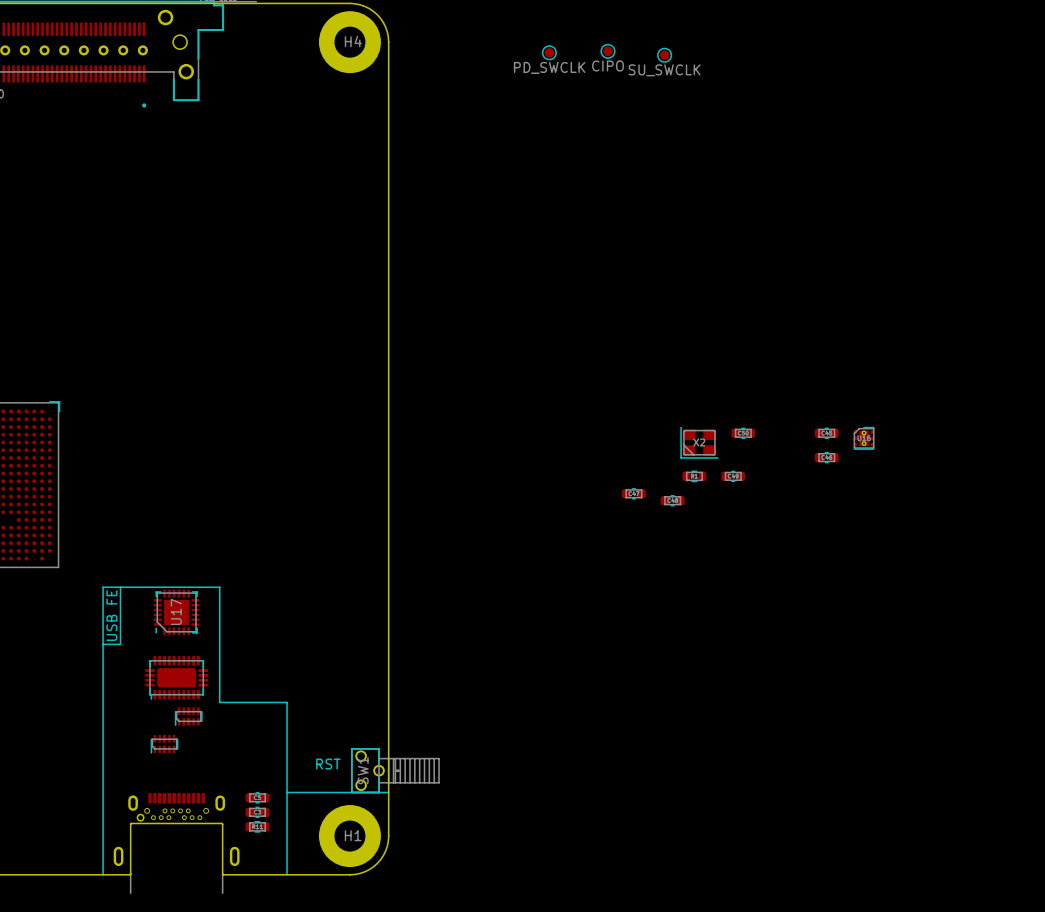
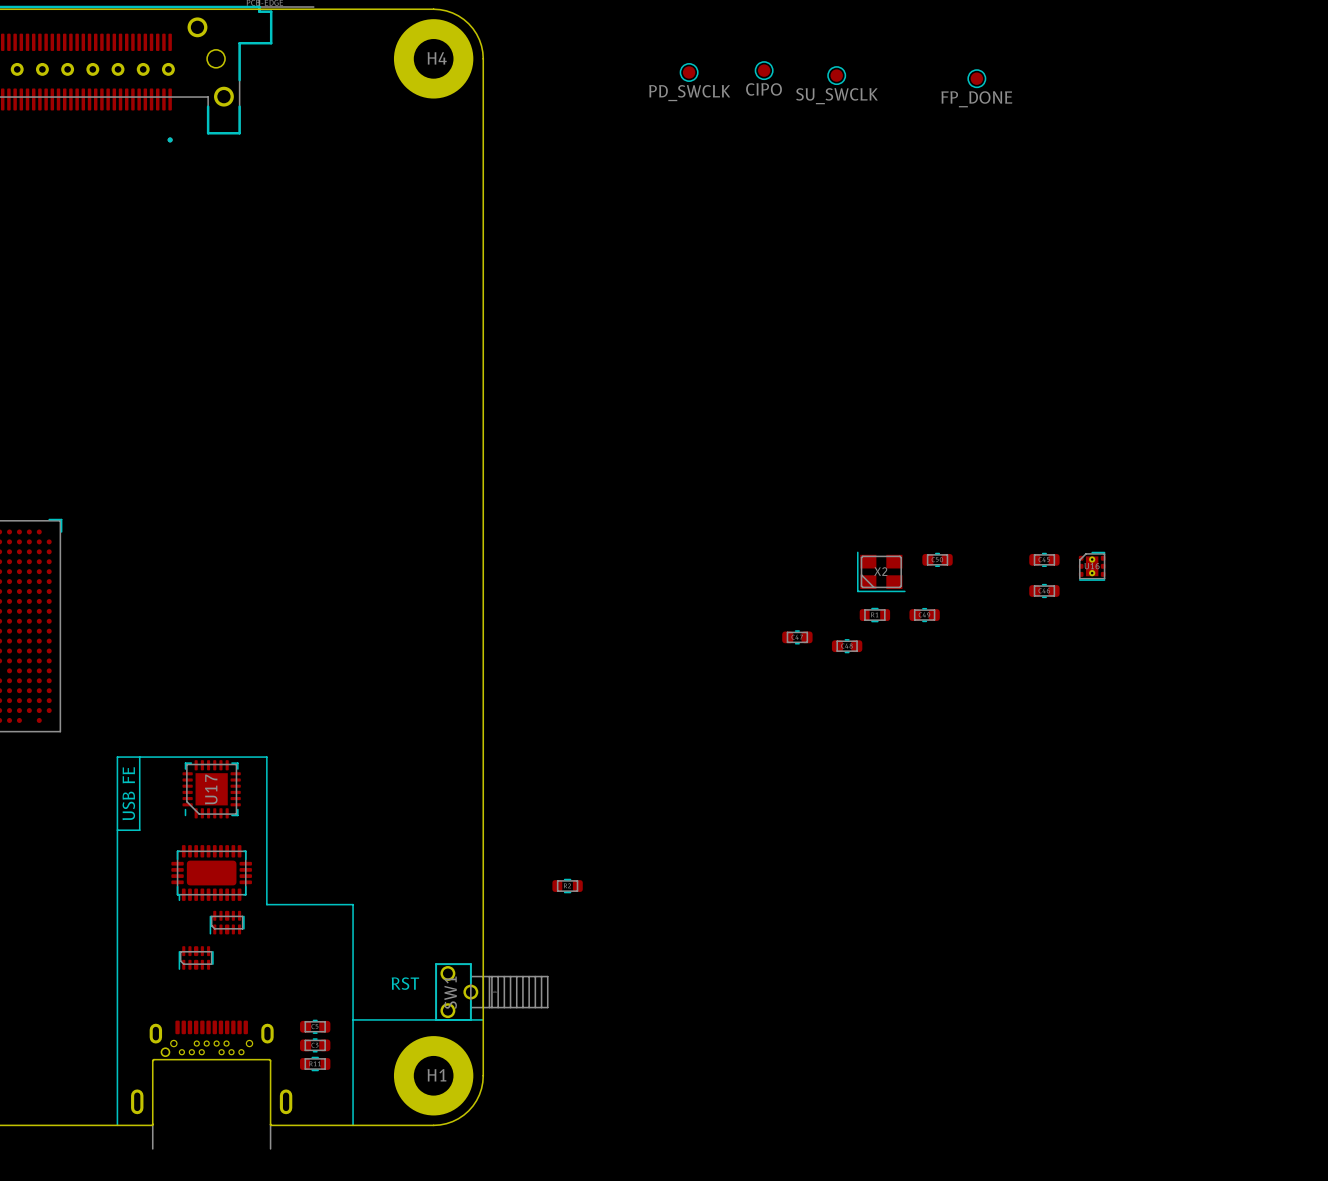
part: none -> FP_DONE (976, 78)
part: none -> (567, 886)

